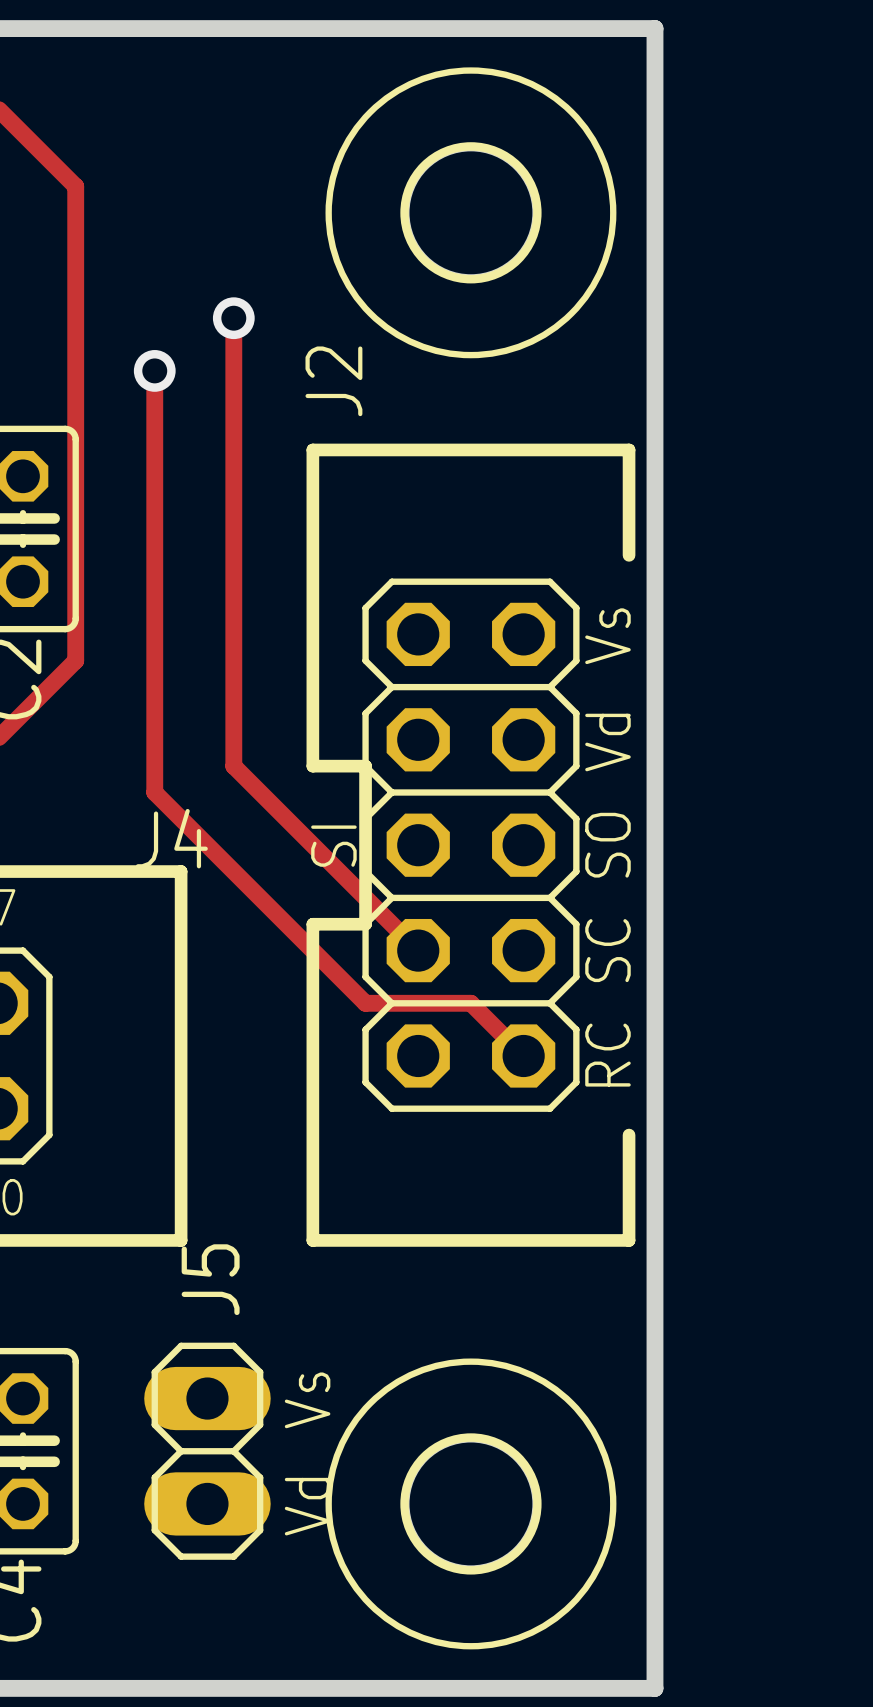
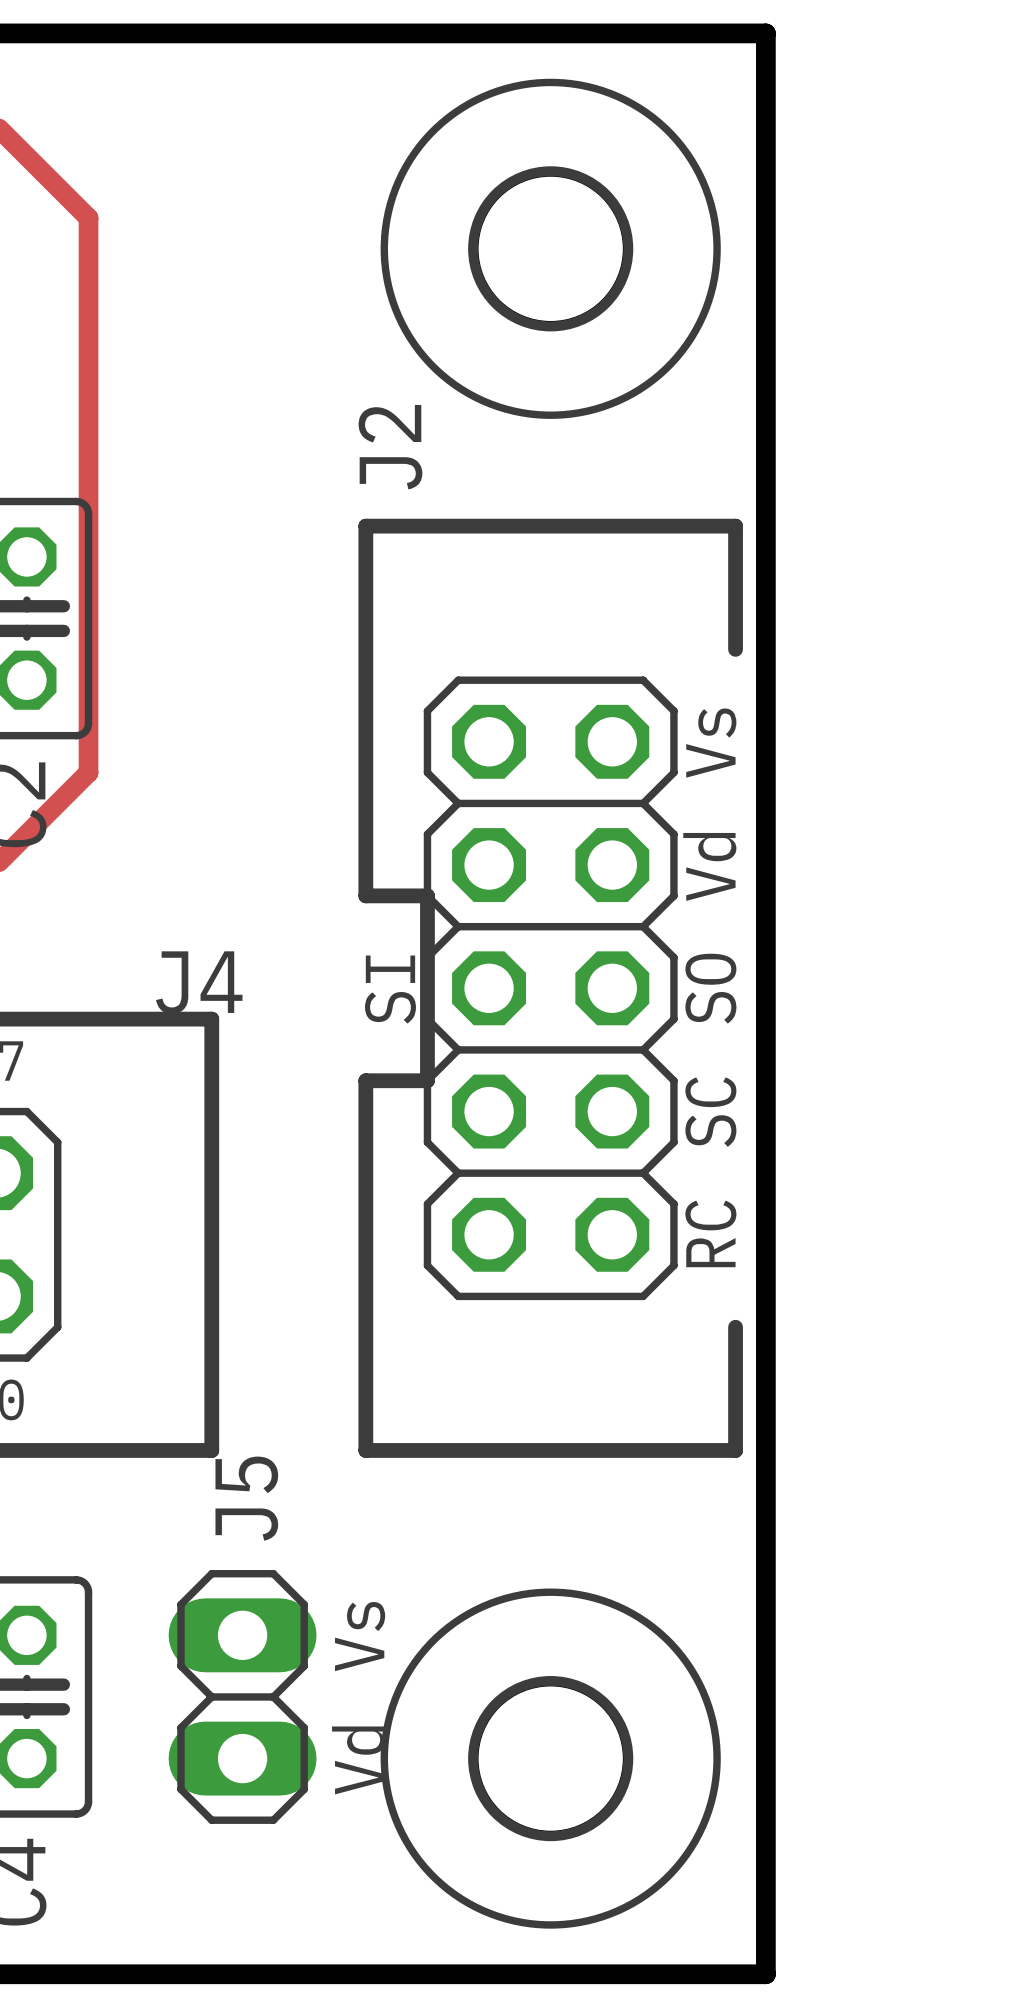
track: (233, 318) (233, 766) (418, 950) -> none
via: (233, 318) -> none
track: (154, 370) (154, 792) (365, 1003) (470, 1003) (523, 1056) -> none
via: (154, 370) -> none

